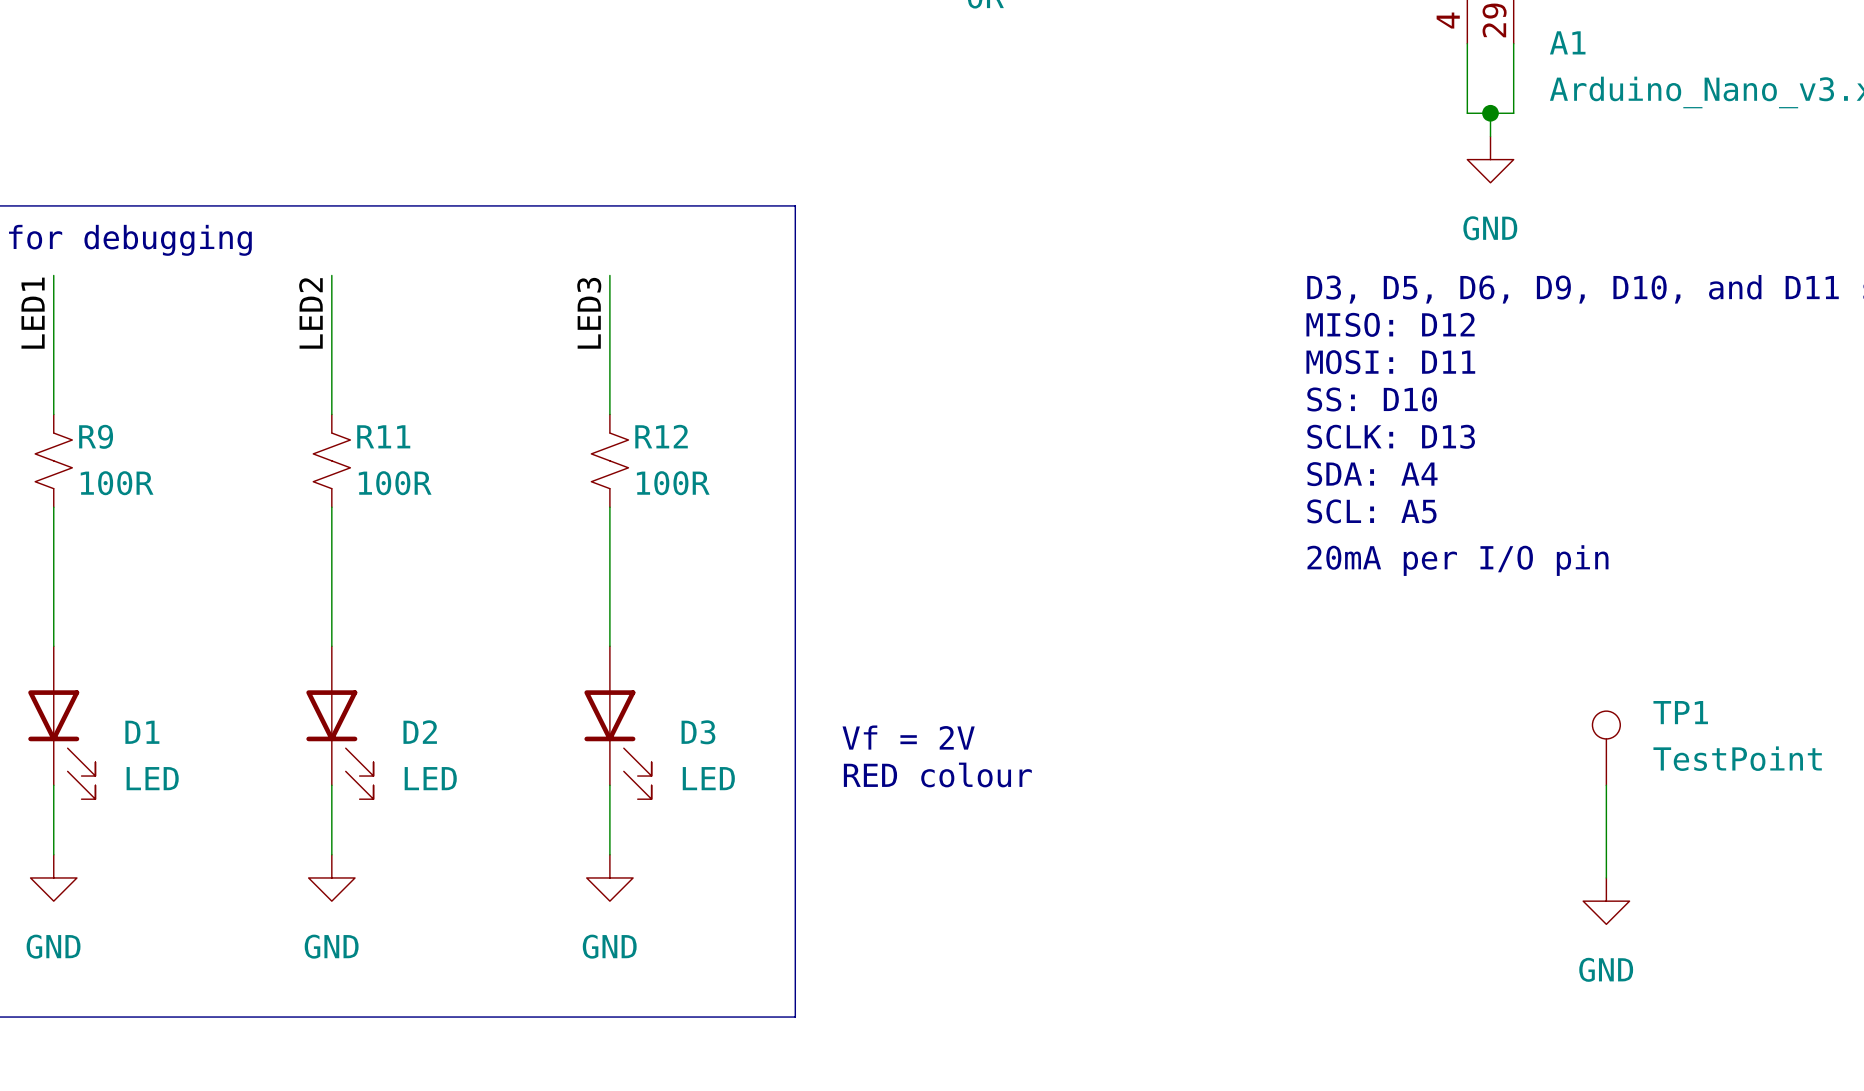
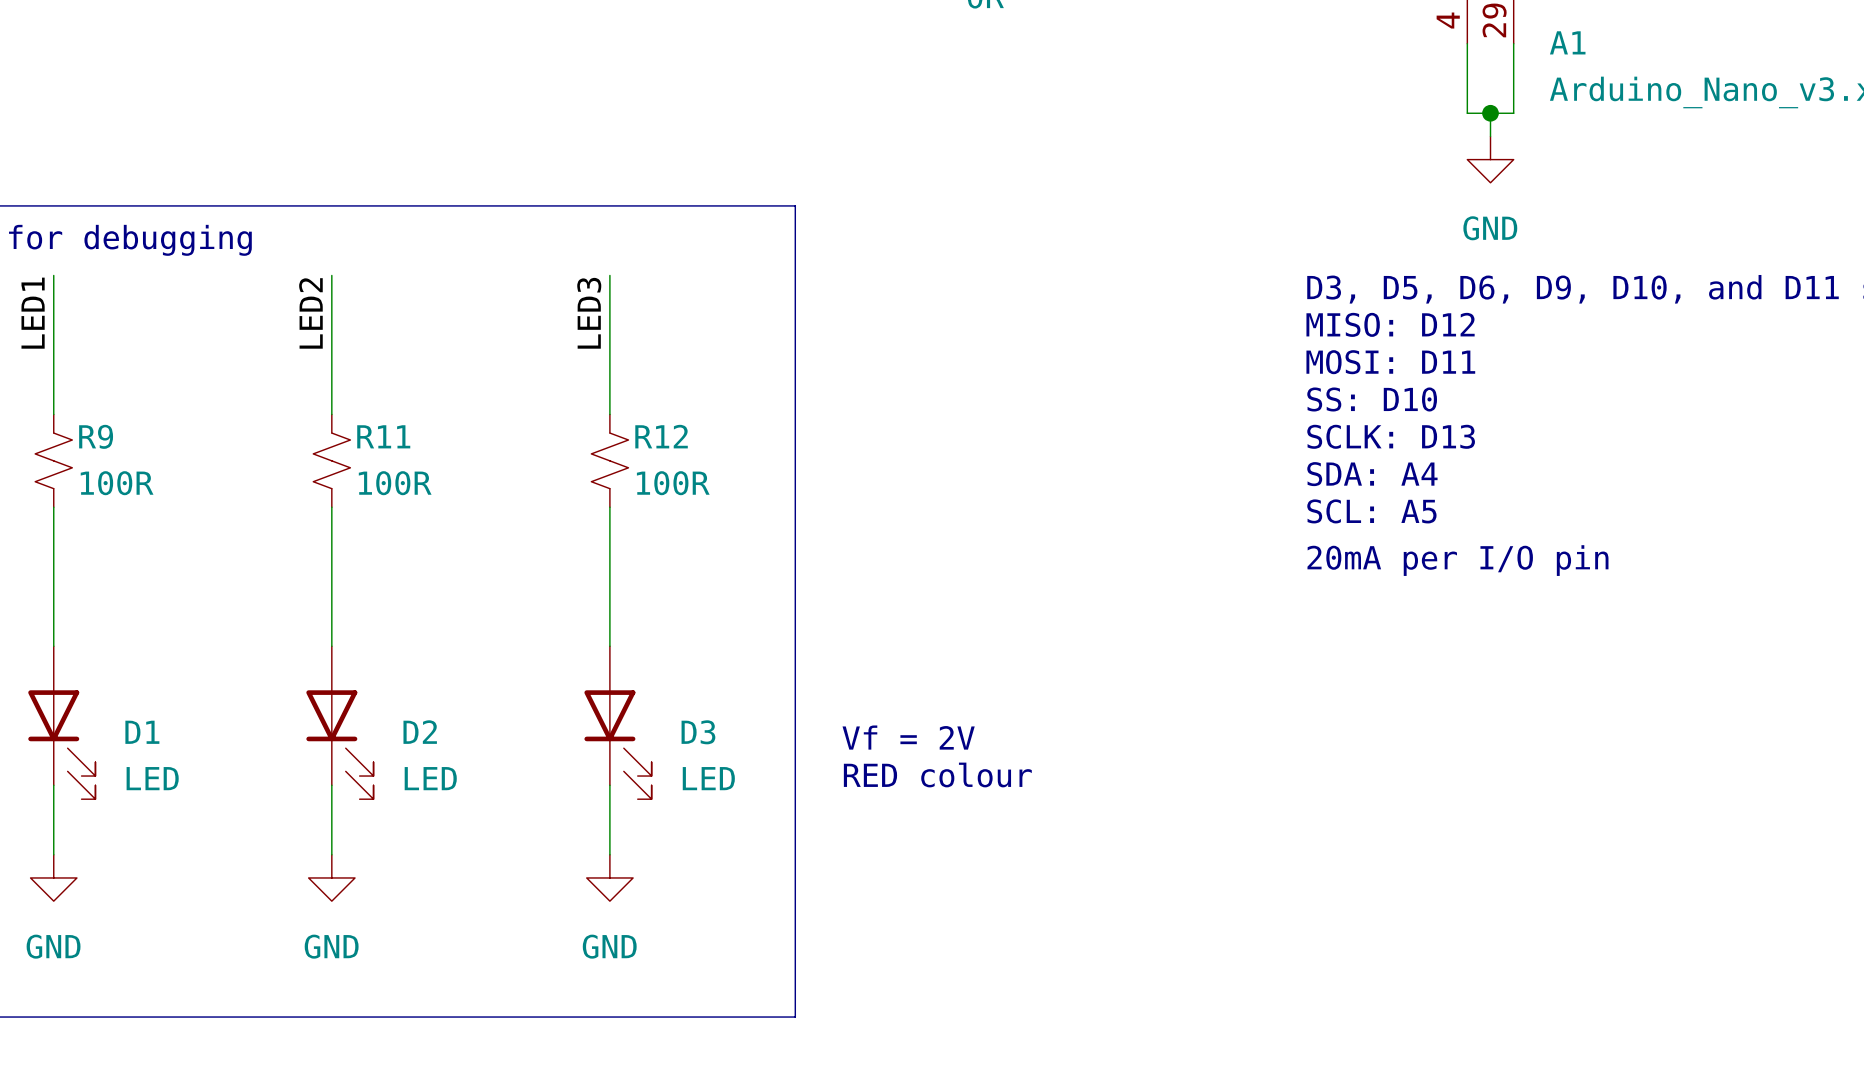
TP1: TestPoint (1606, 748) -> none
wire: (1606, 785) (1606, 877) -> none
power symbol: GND (1606, 901) -> none

